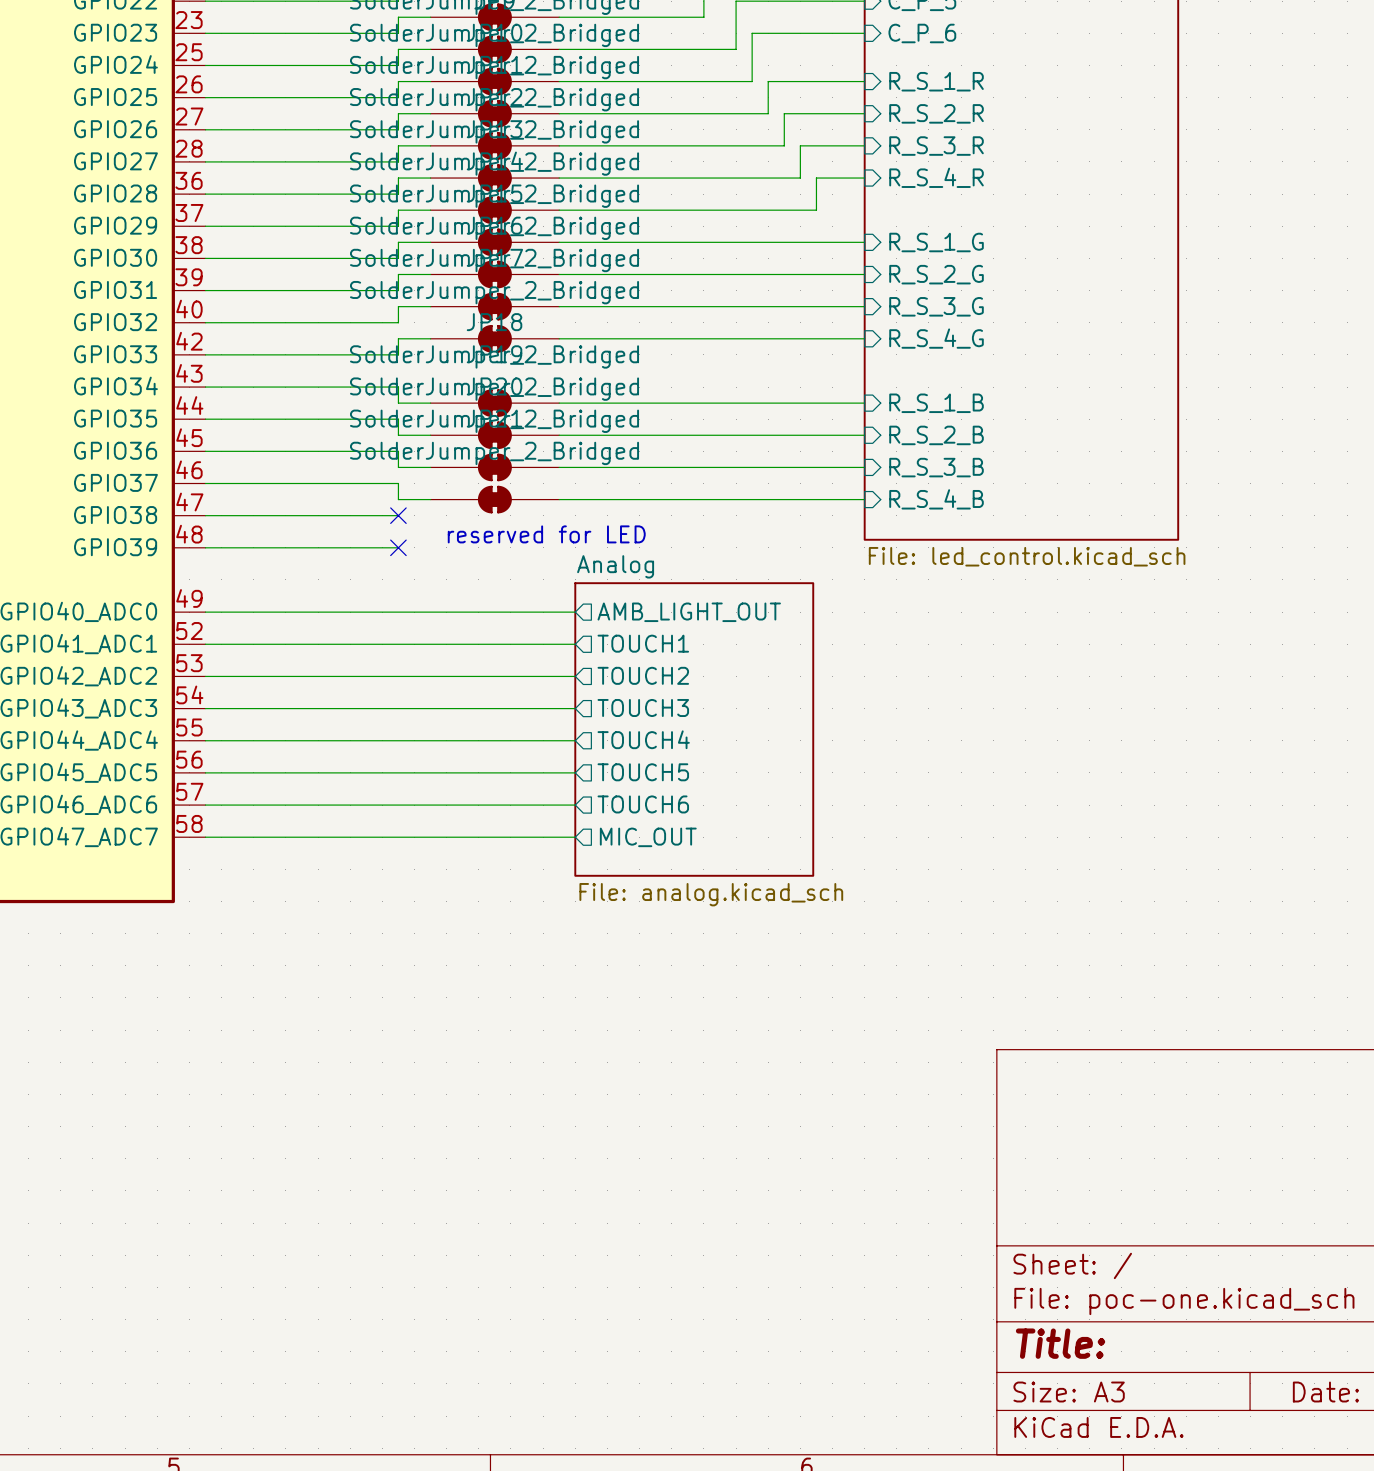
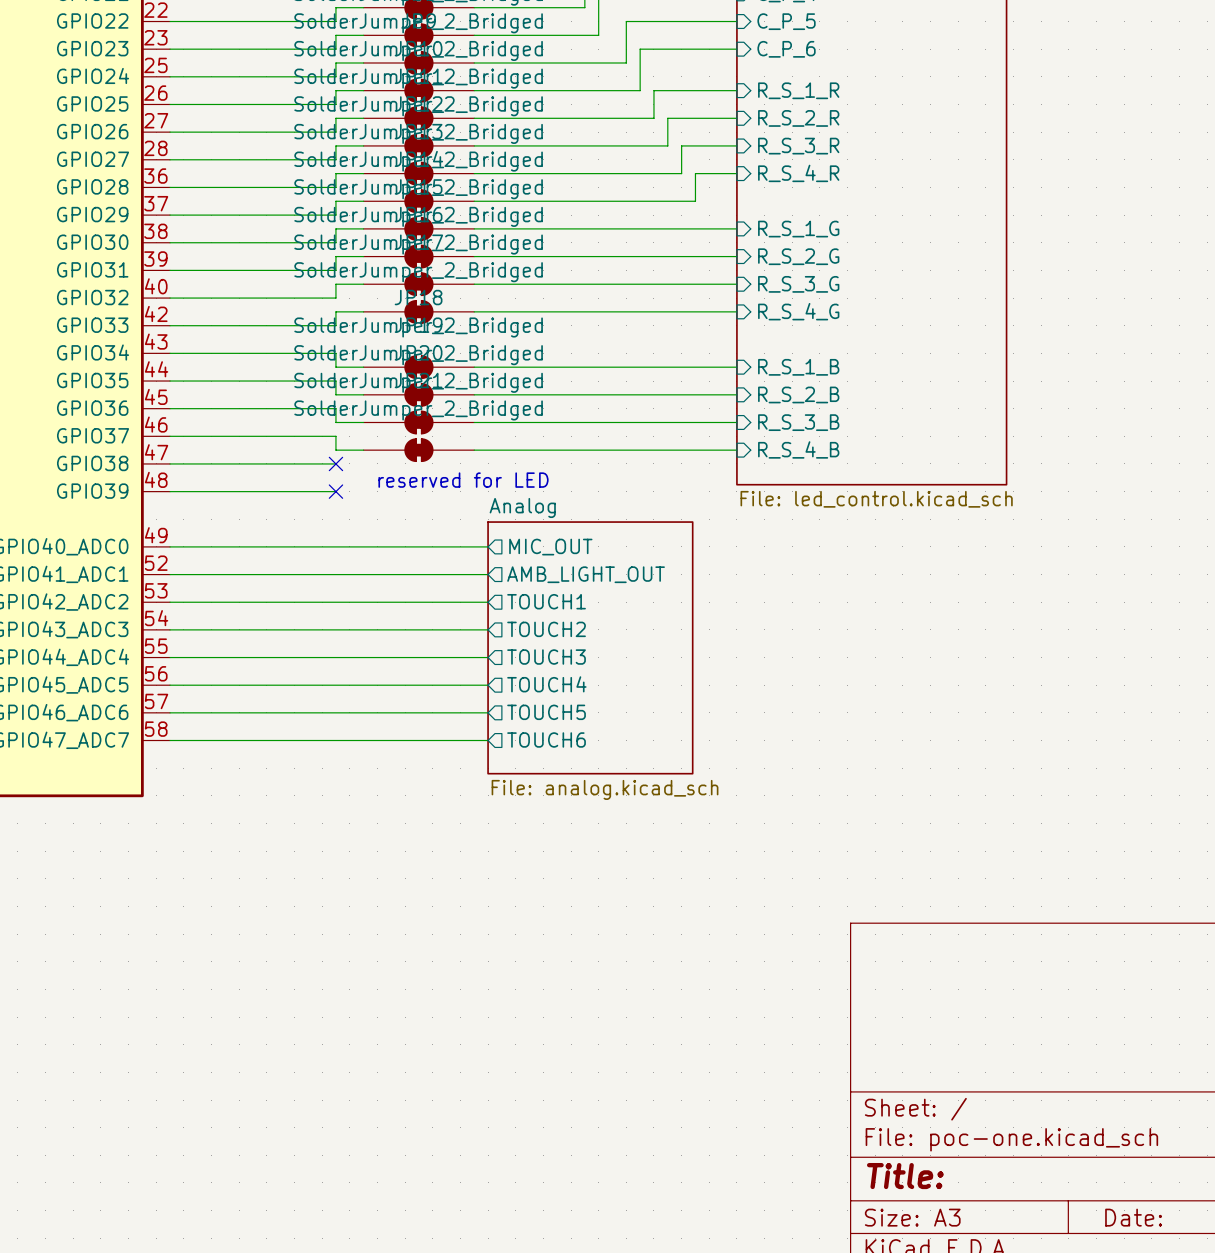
sheet pin: AMB_LIGHT_OUT (689, 612) -> MIC_OUT (550, 547)
sheet pin: TOUCH1 (643, 643) -> AMB_LIGHT_OUT (586, 574)
sheet pin: TOUCH2 (643, 675) -> TOUCH1 (546, 601)
sheet pin: TOUCH3 (643, 707) -> TOUCH2 (546, 629)
sheet pin: TOUCH4 (643, 739) -> TOUCH3 (546, 657)
sheet pin: TOUCH5 (643, 772) -> TOUCH4 (546, 684)
sheet pin: TOUCH6 (643, 804) -> TOUCH5 (546, 712)
sheet pin: MIC_OUT (648, 837) -> TOUCH6 (546, 739)

